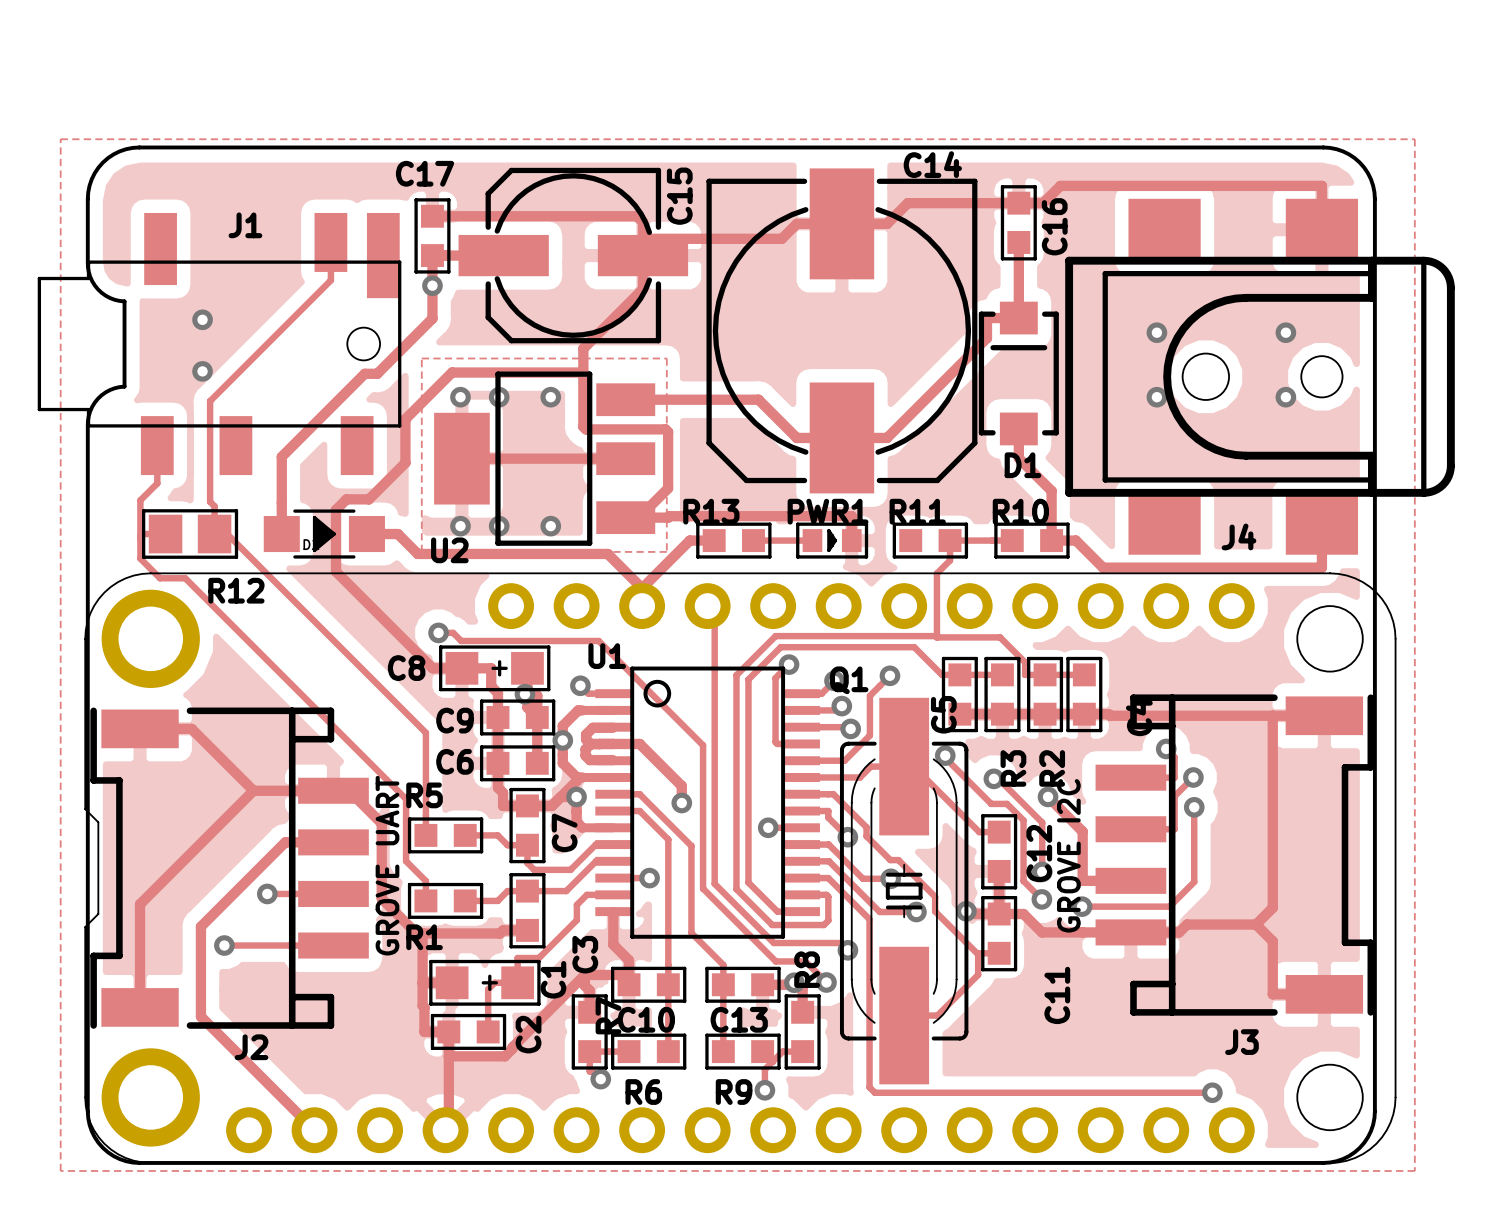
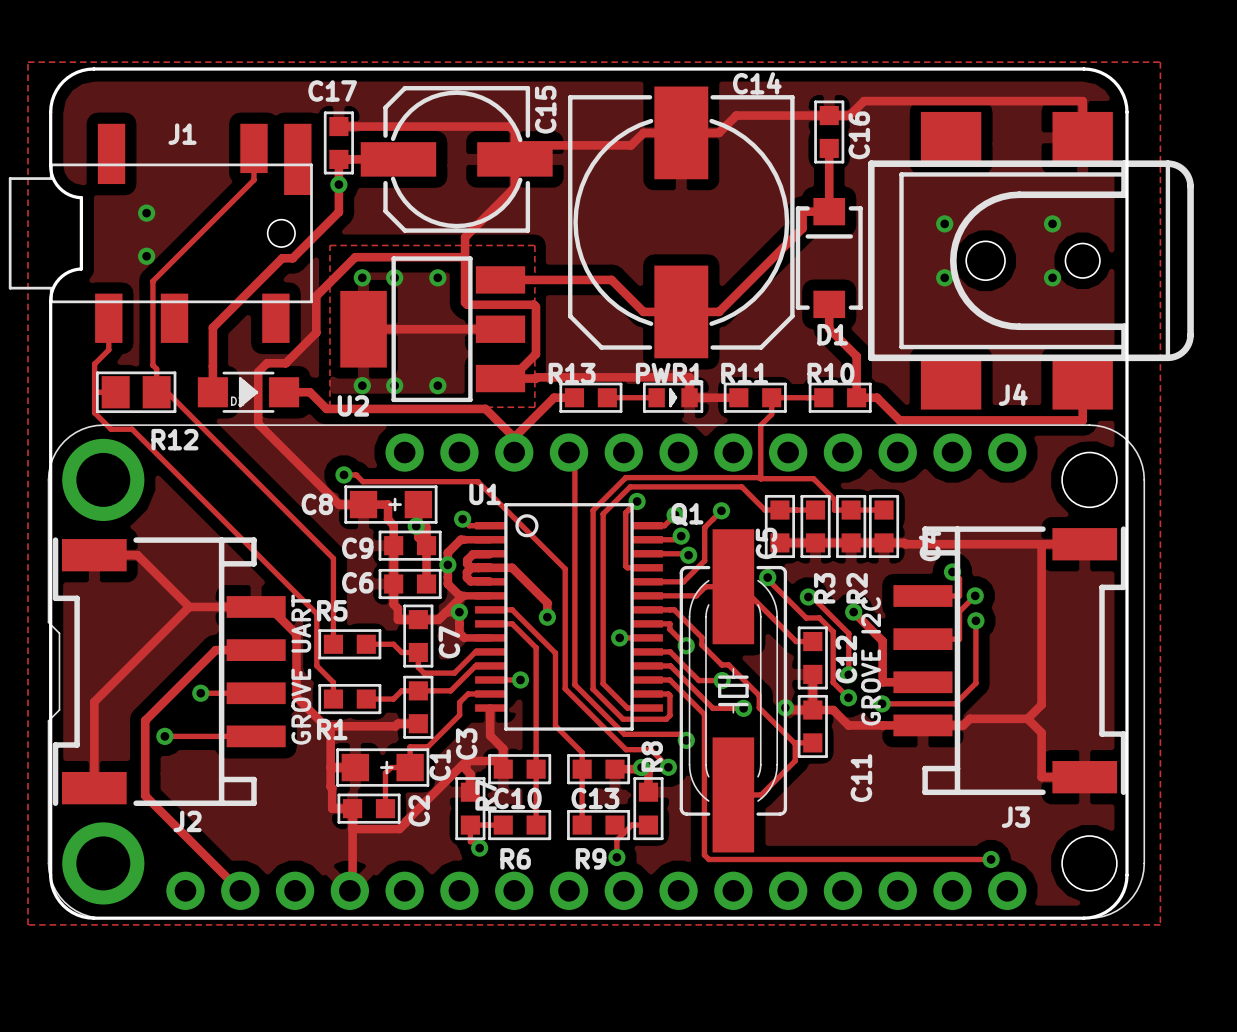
track: none -> (689, 397) (738, 397)

